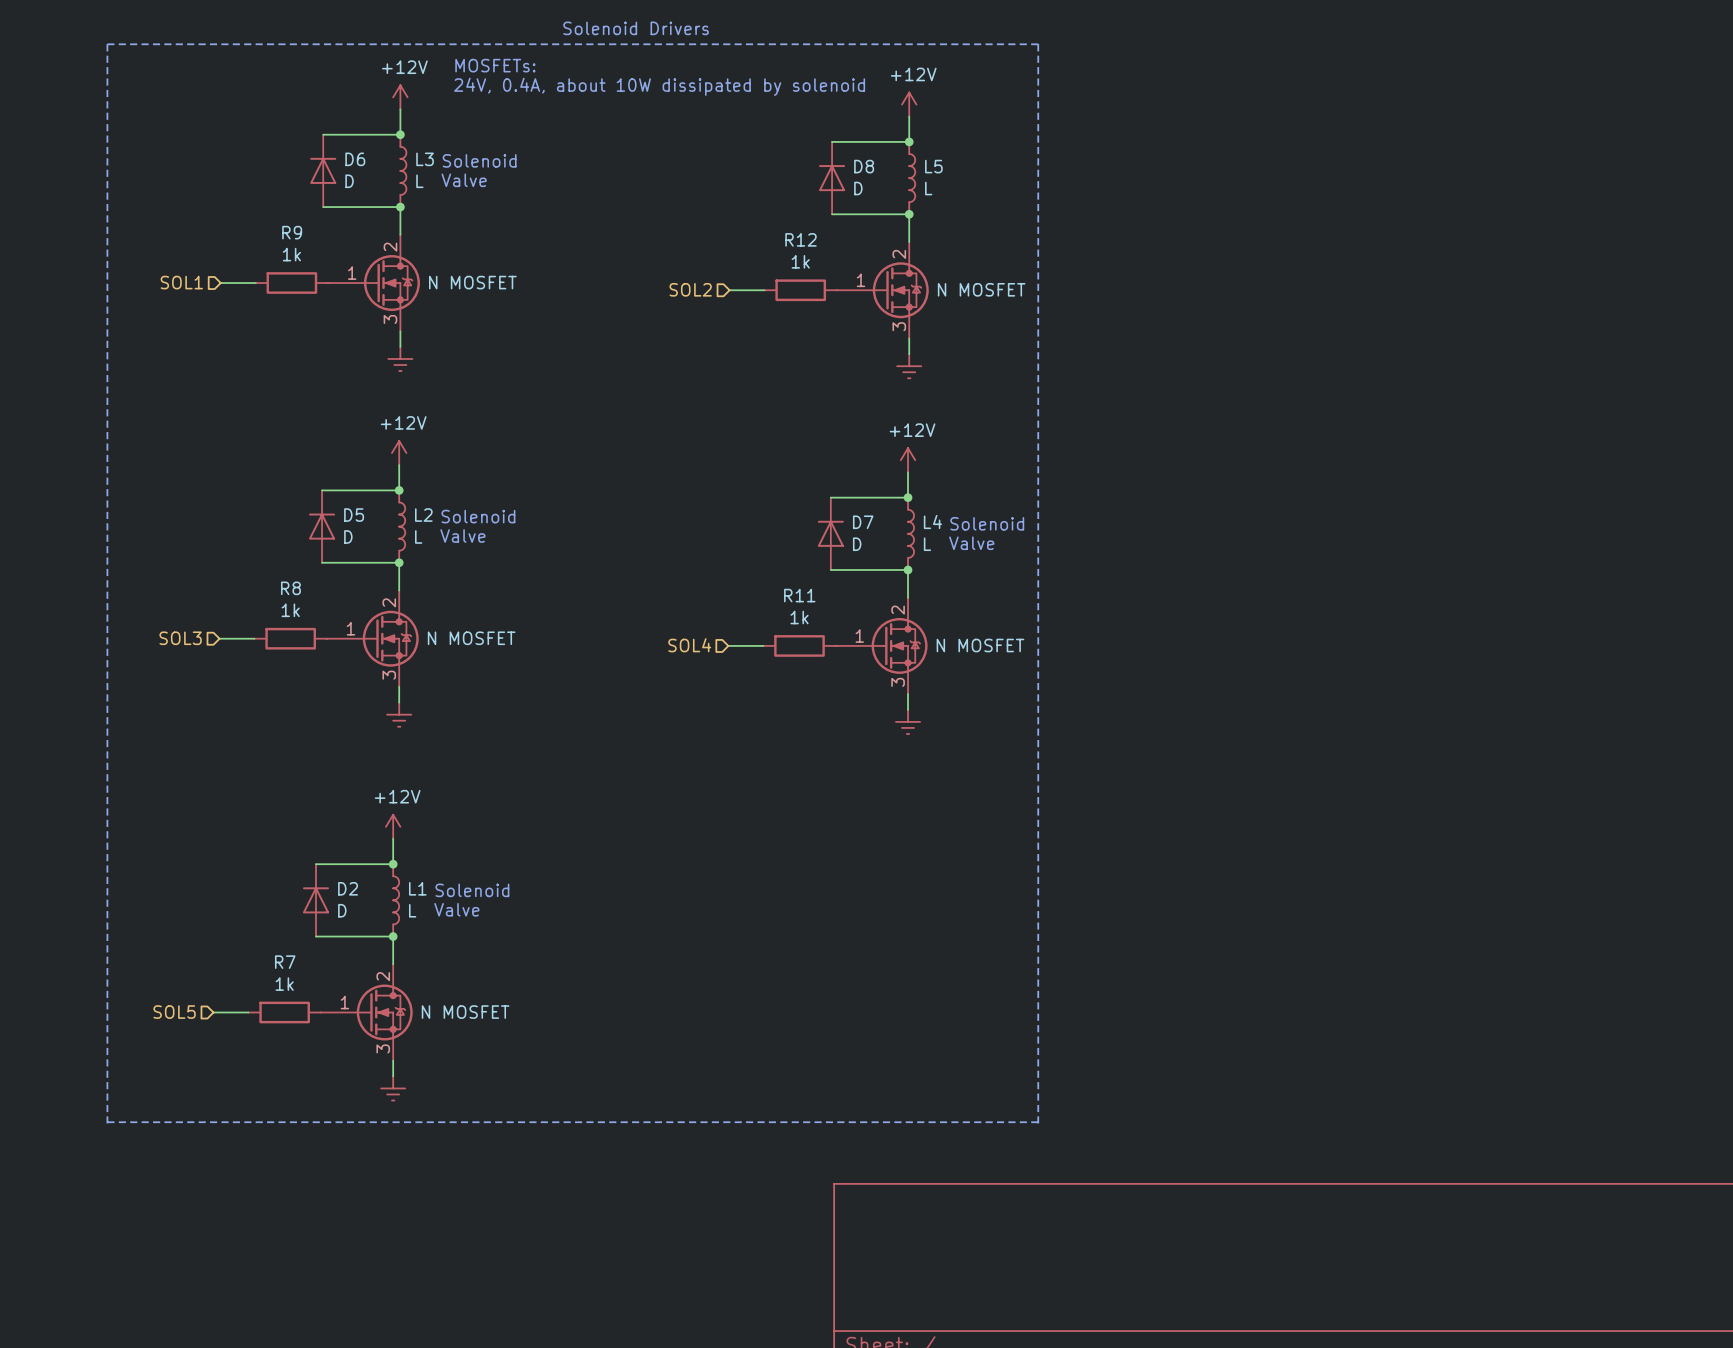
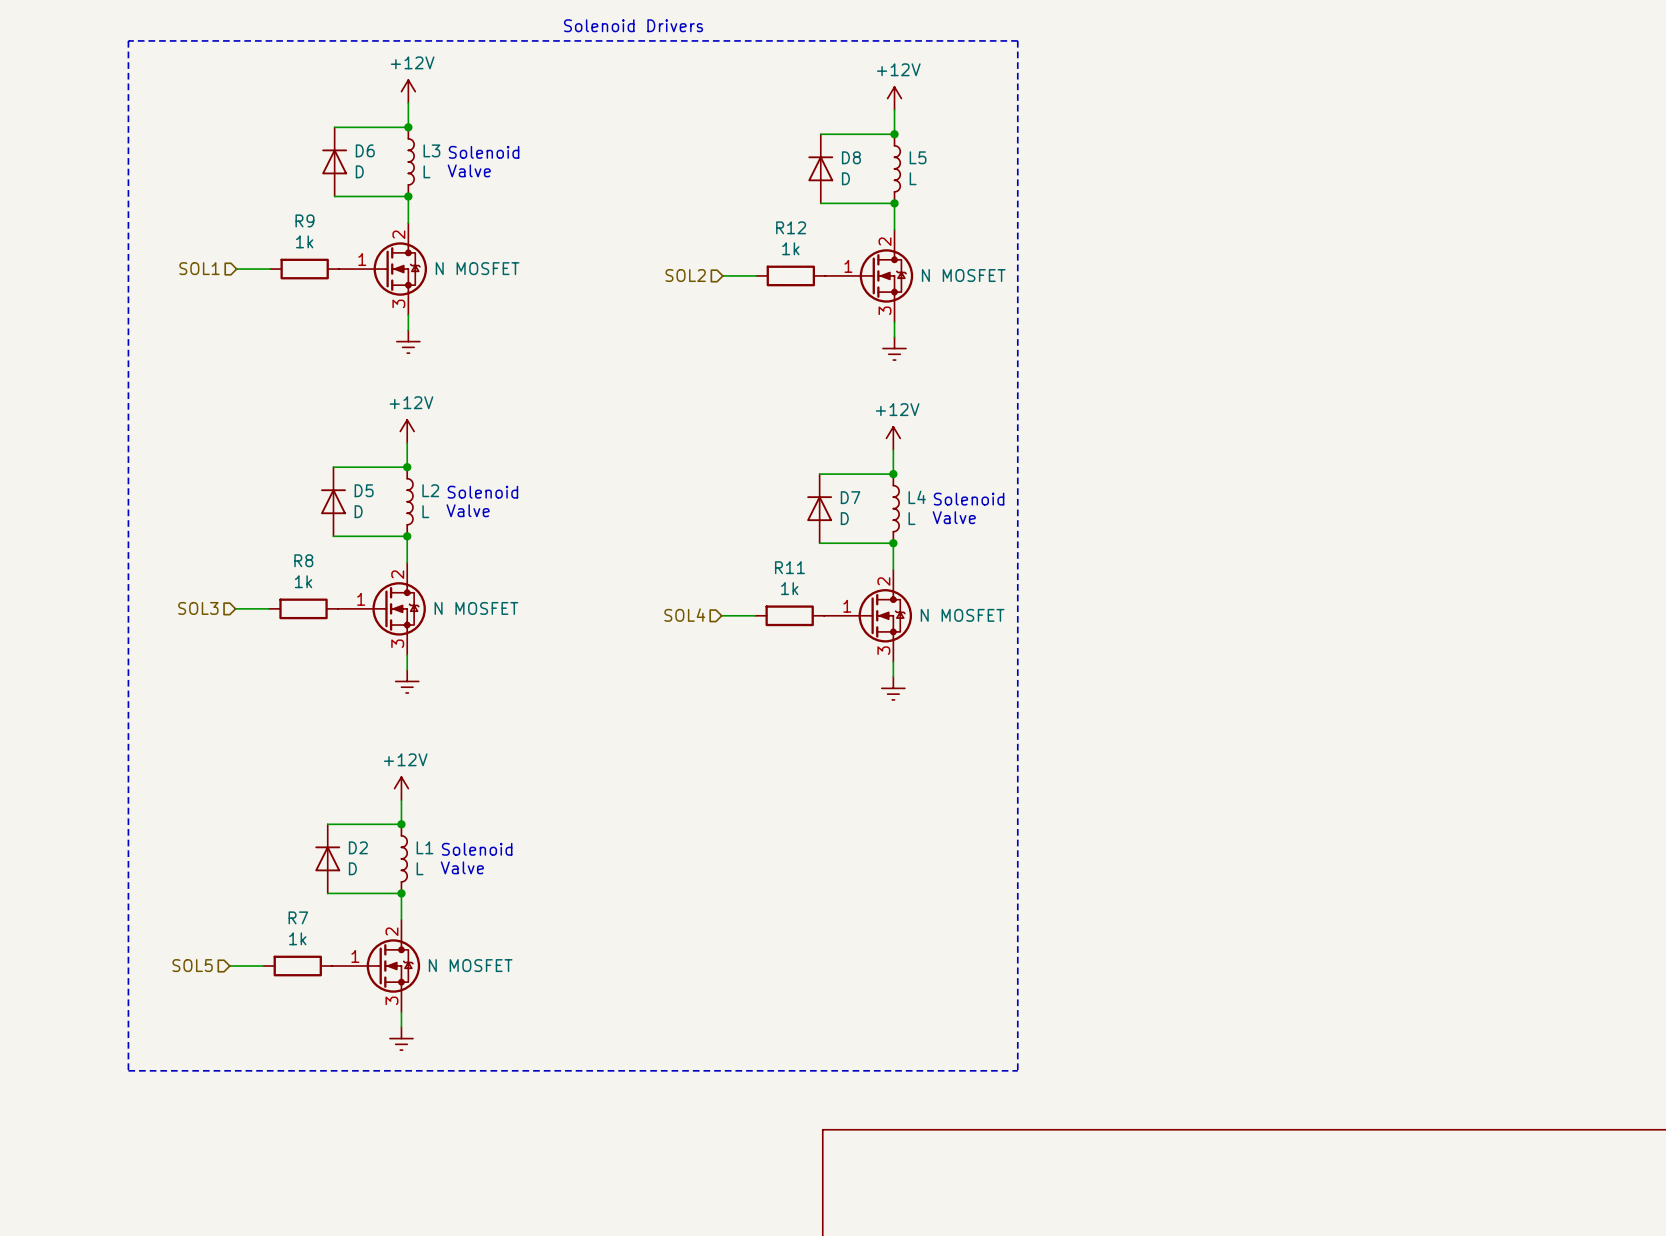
text: MOSFETs: (495, 65) -> none
text: 24V, 0.4A, about 10W dissipated by solenoid (659, 86) -> none

